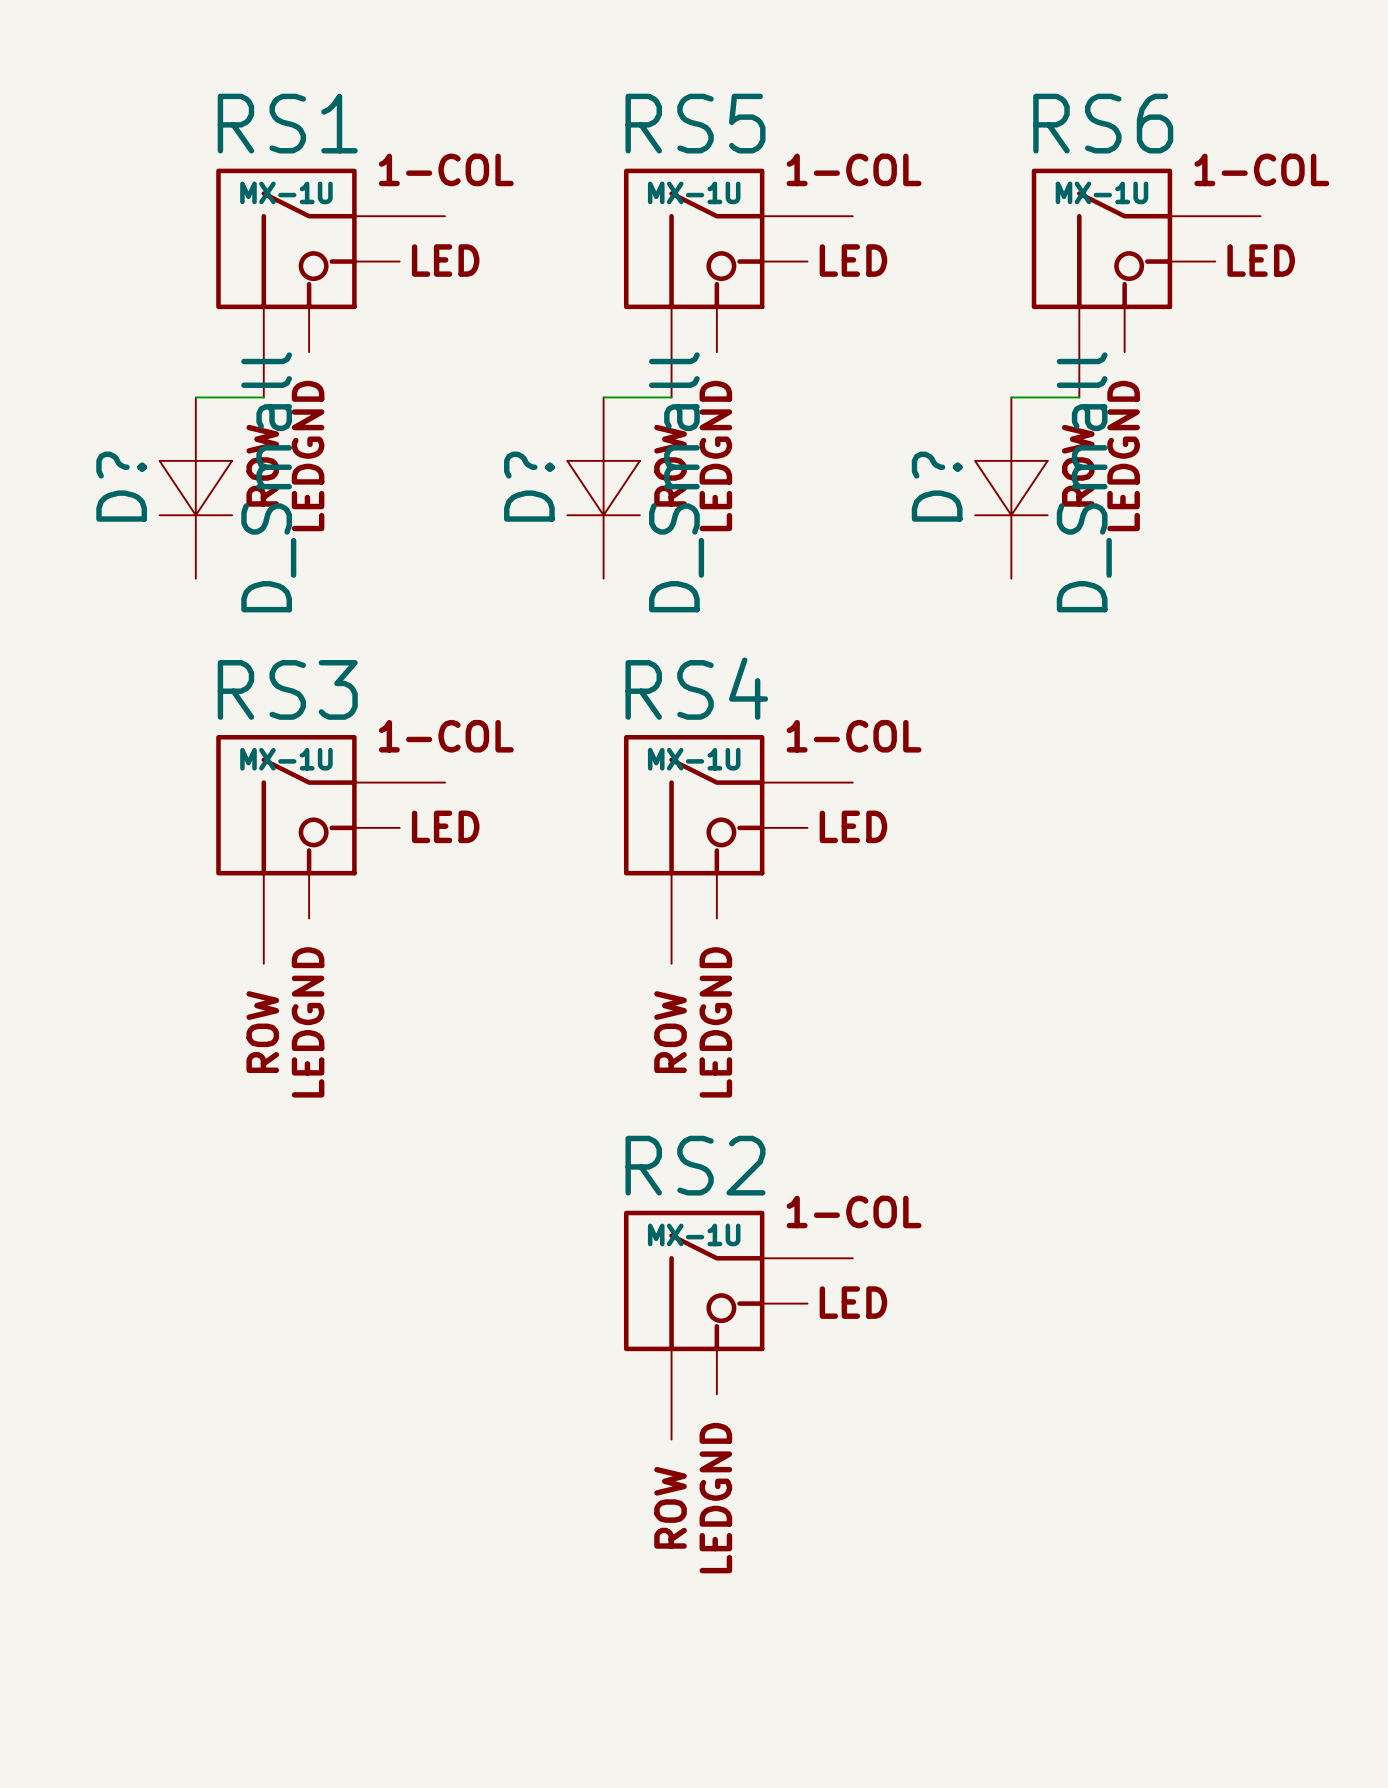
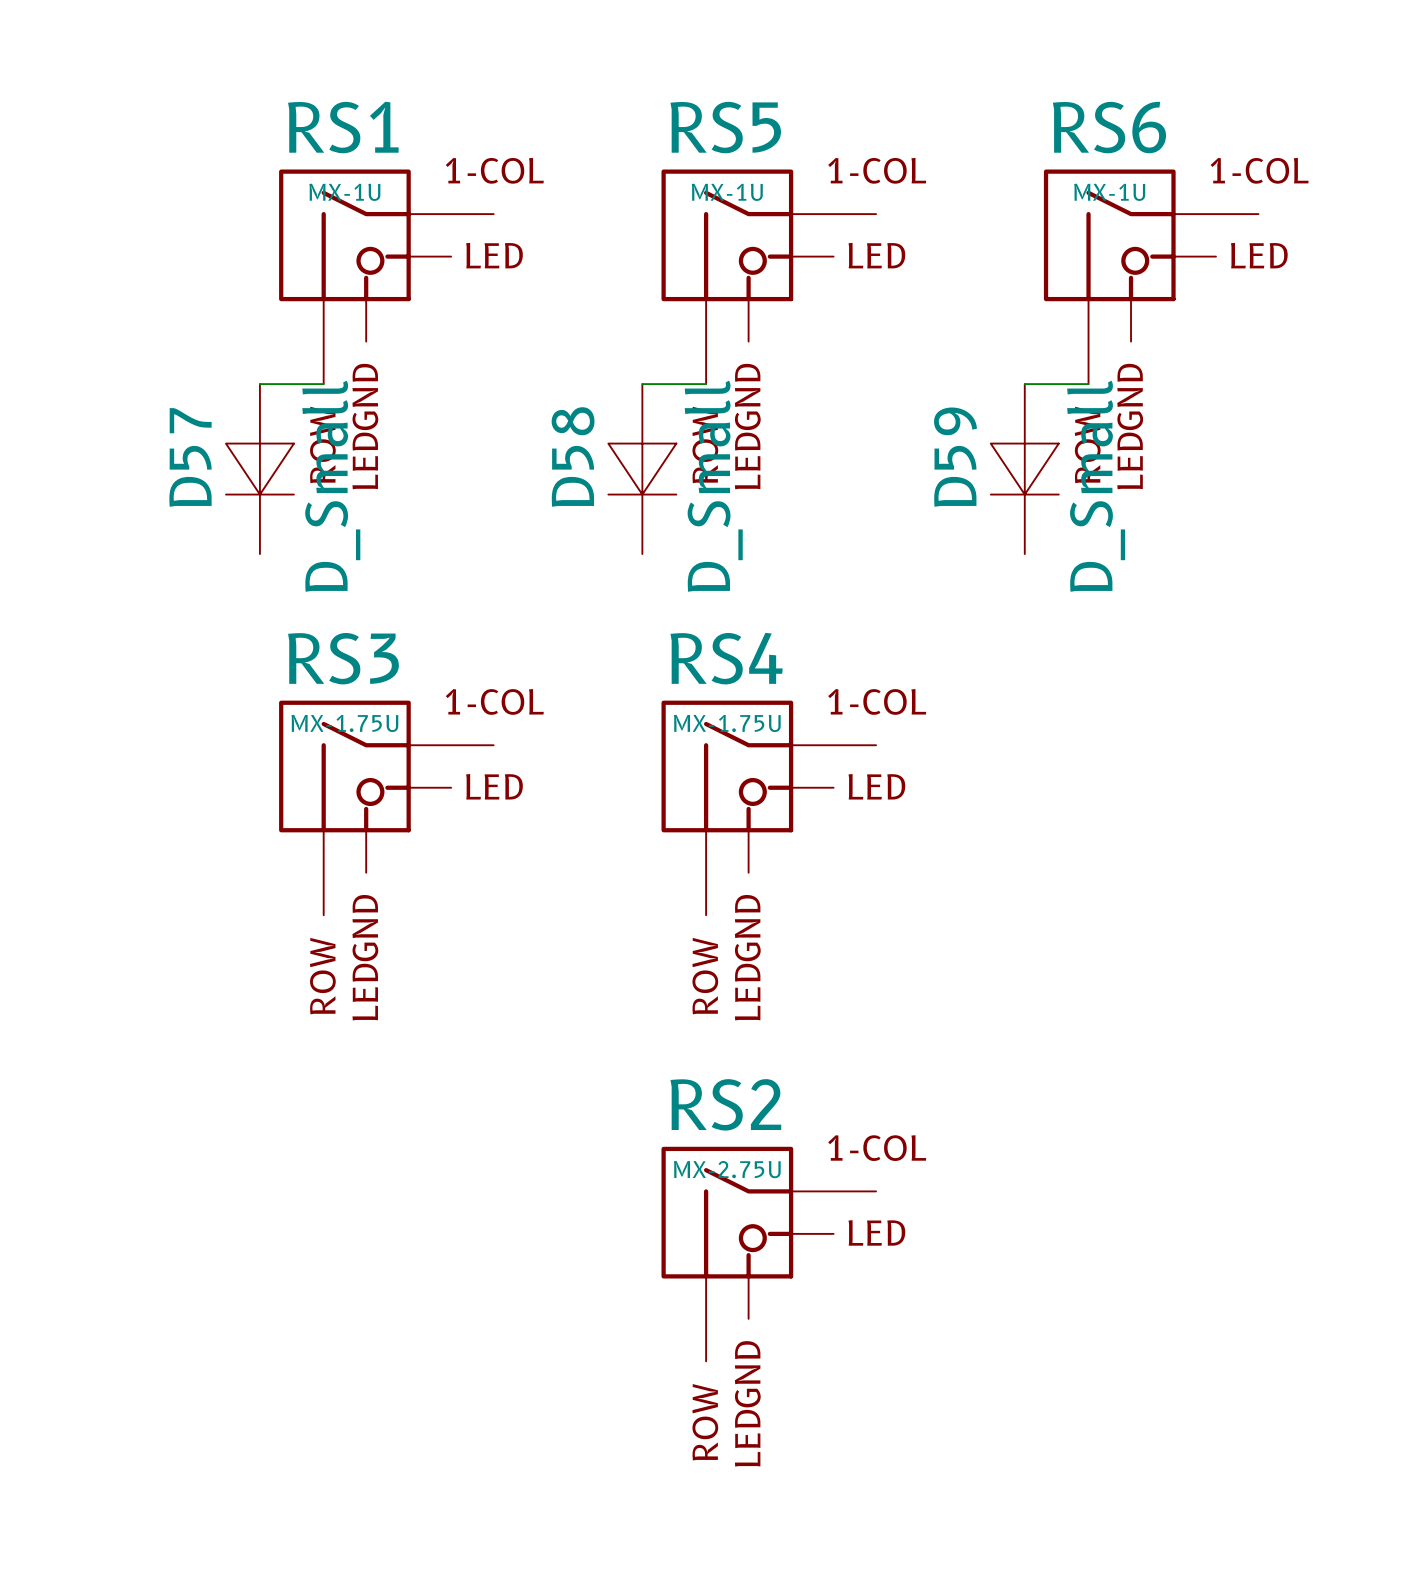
D? name: D? (121, 486) -> D57 (190, 457)
D? name: D? (529, 486) -> D58 (573, 457)
D? name: D? (937, 486) -> D59 (955, 457)
RS3 value: MX-1U (286, 759) -> MX-1.75U (344, 723)
RS4 value: MX-1U (694, 759) -> MX-1.75U (727, 723)
RS2 value: MX-1U (694, 1234) -> MX-2.75U (727, 1169)

